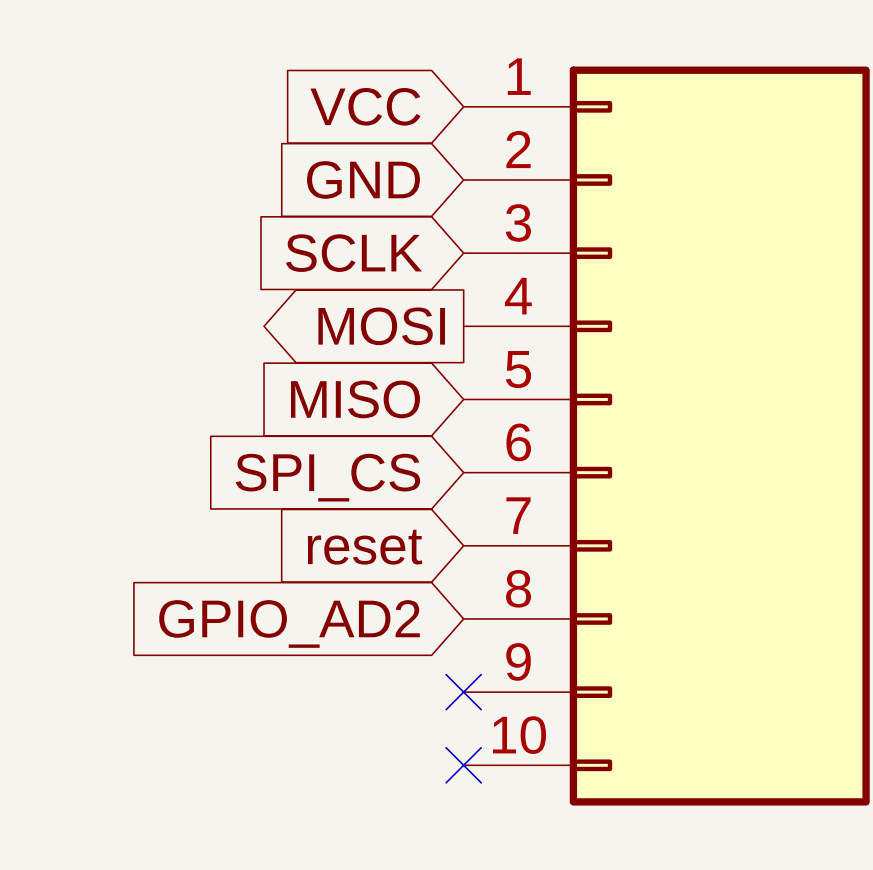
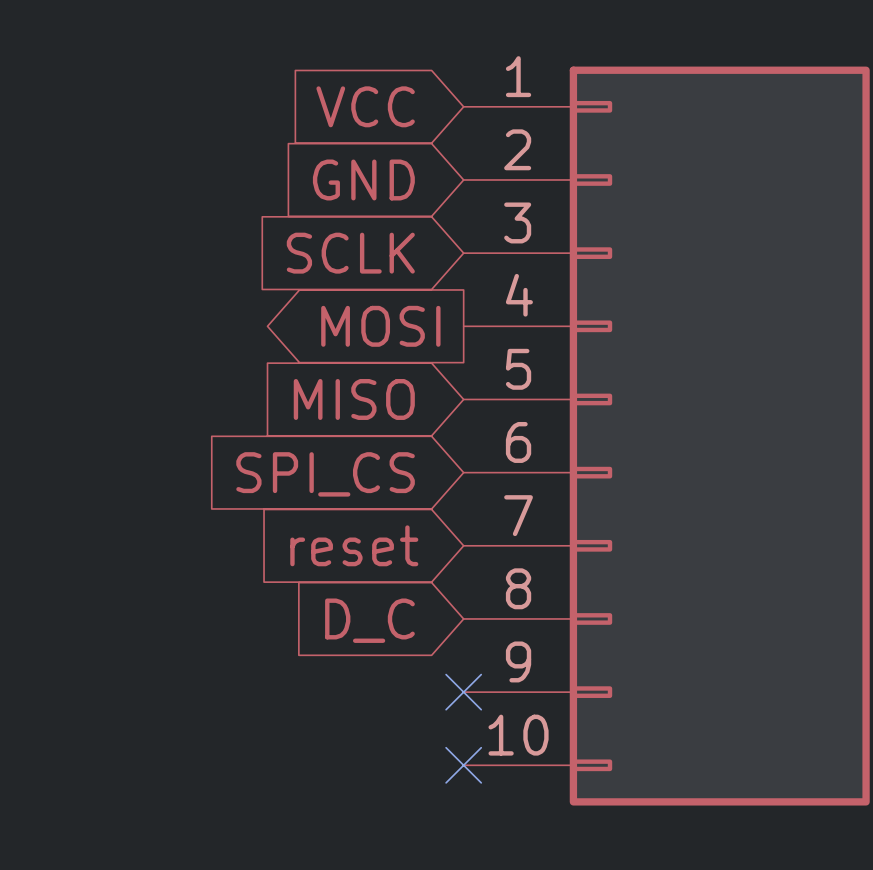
global label: GPIO_AD2 (289, 623) -> D_C (369, 620)

